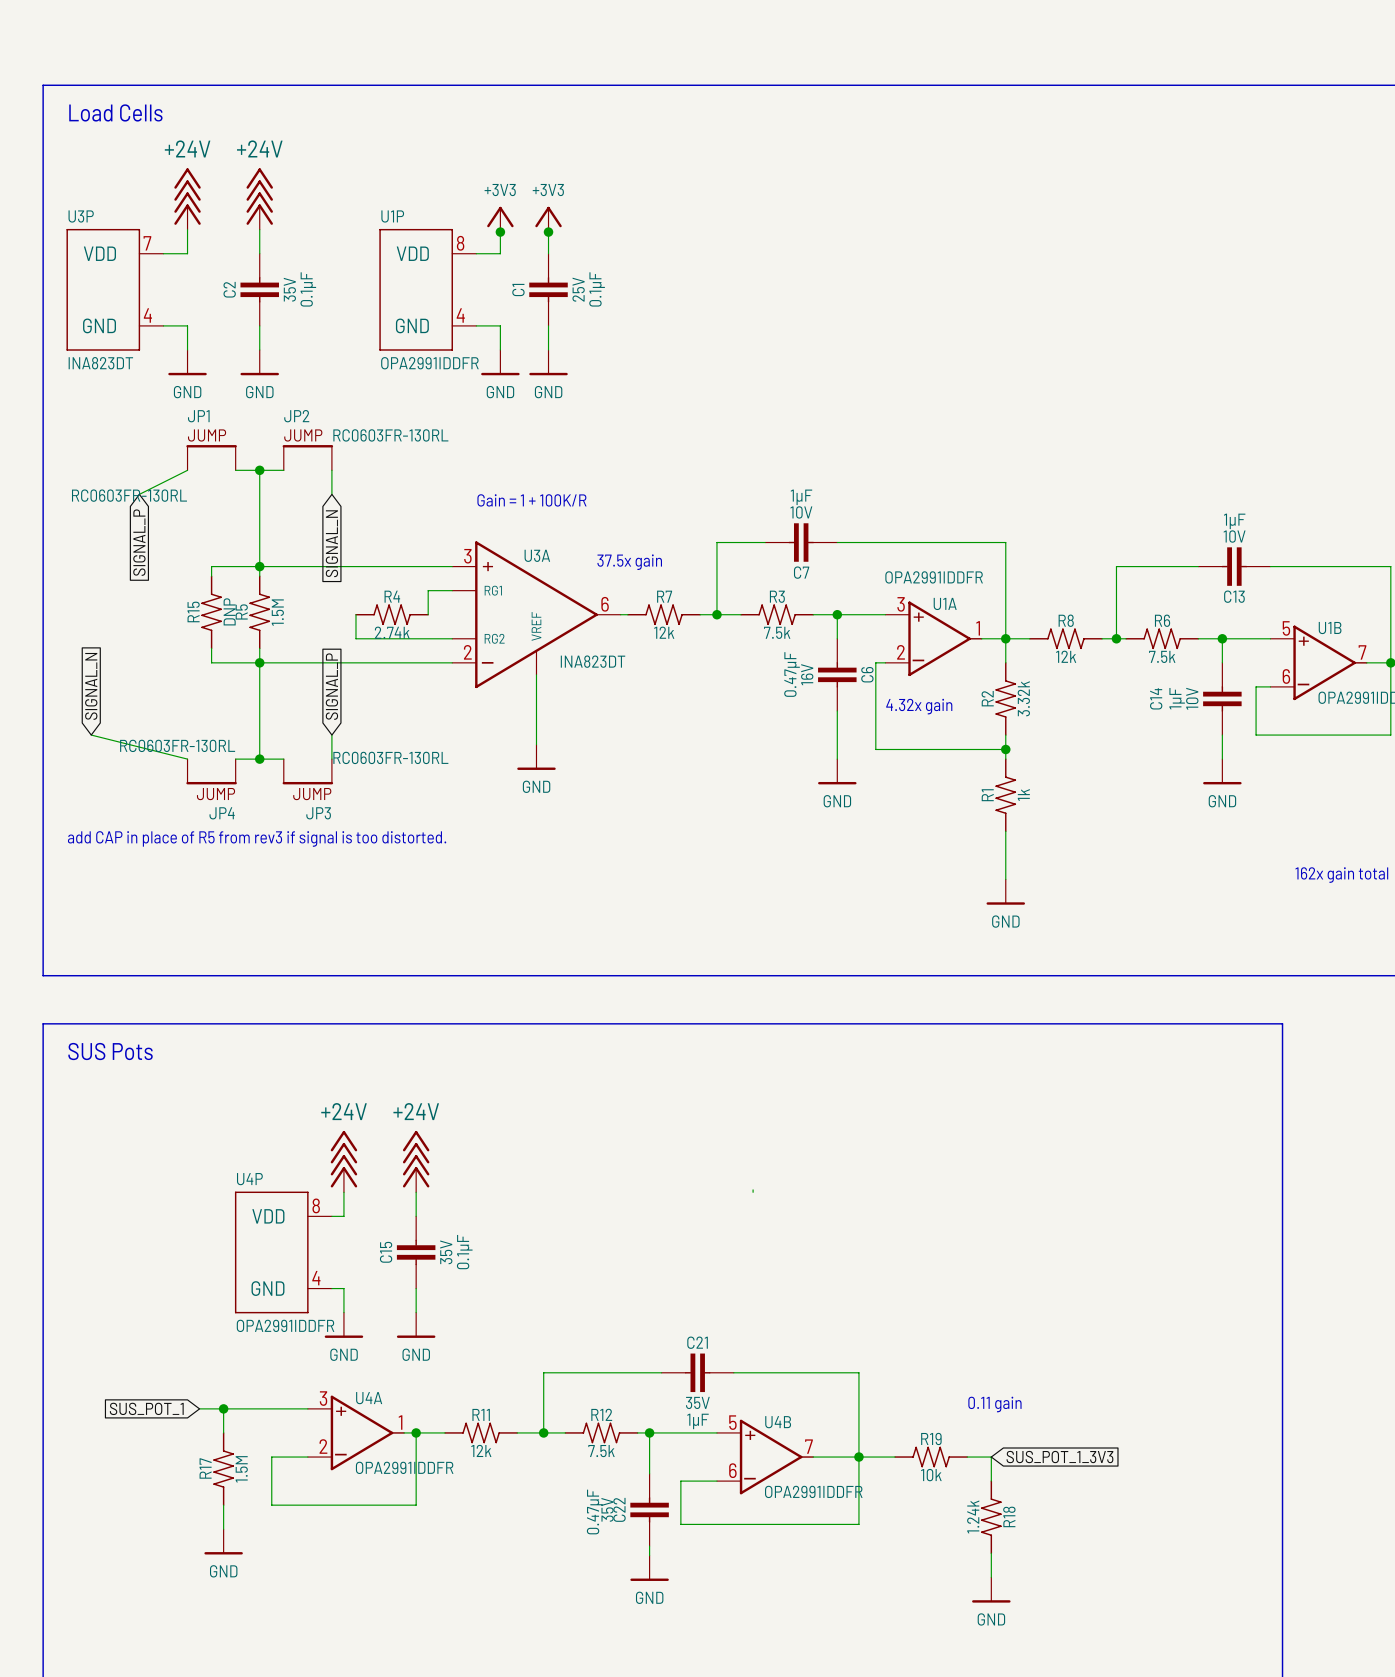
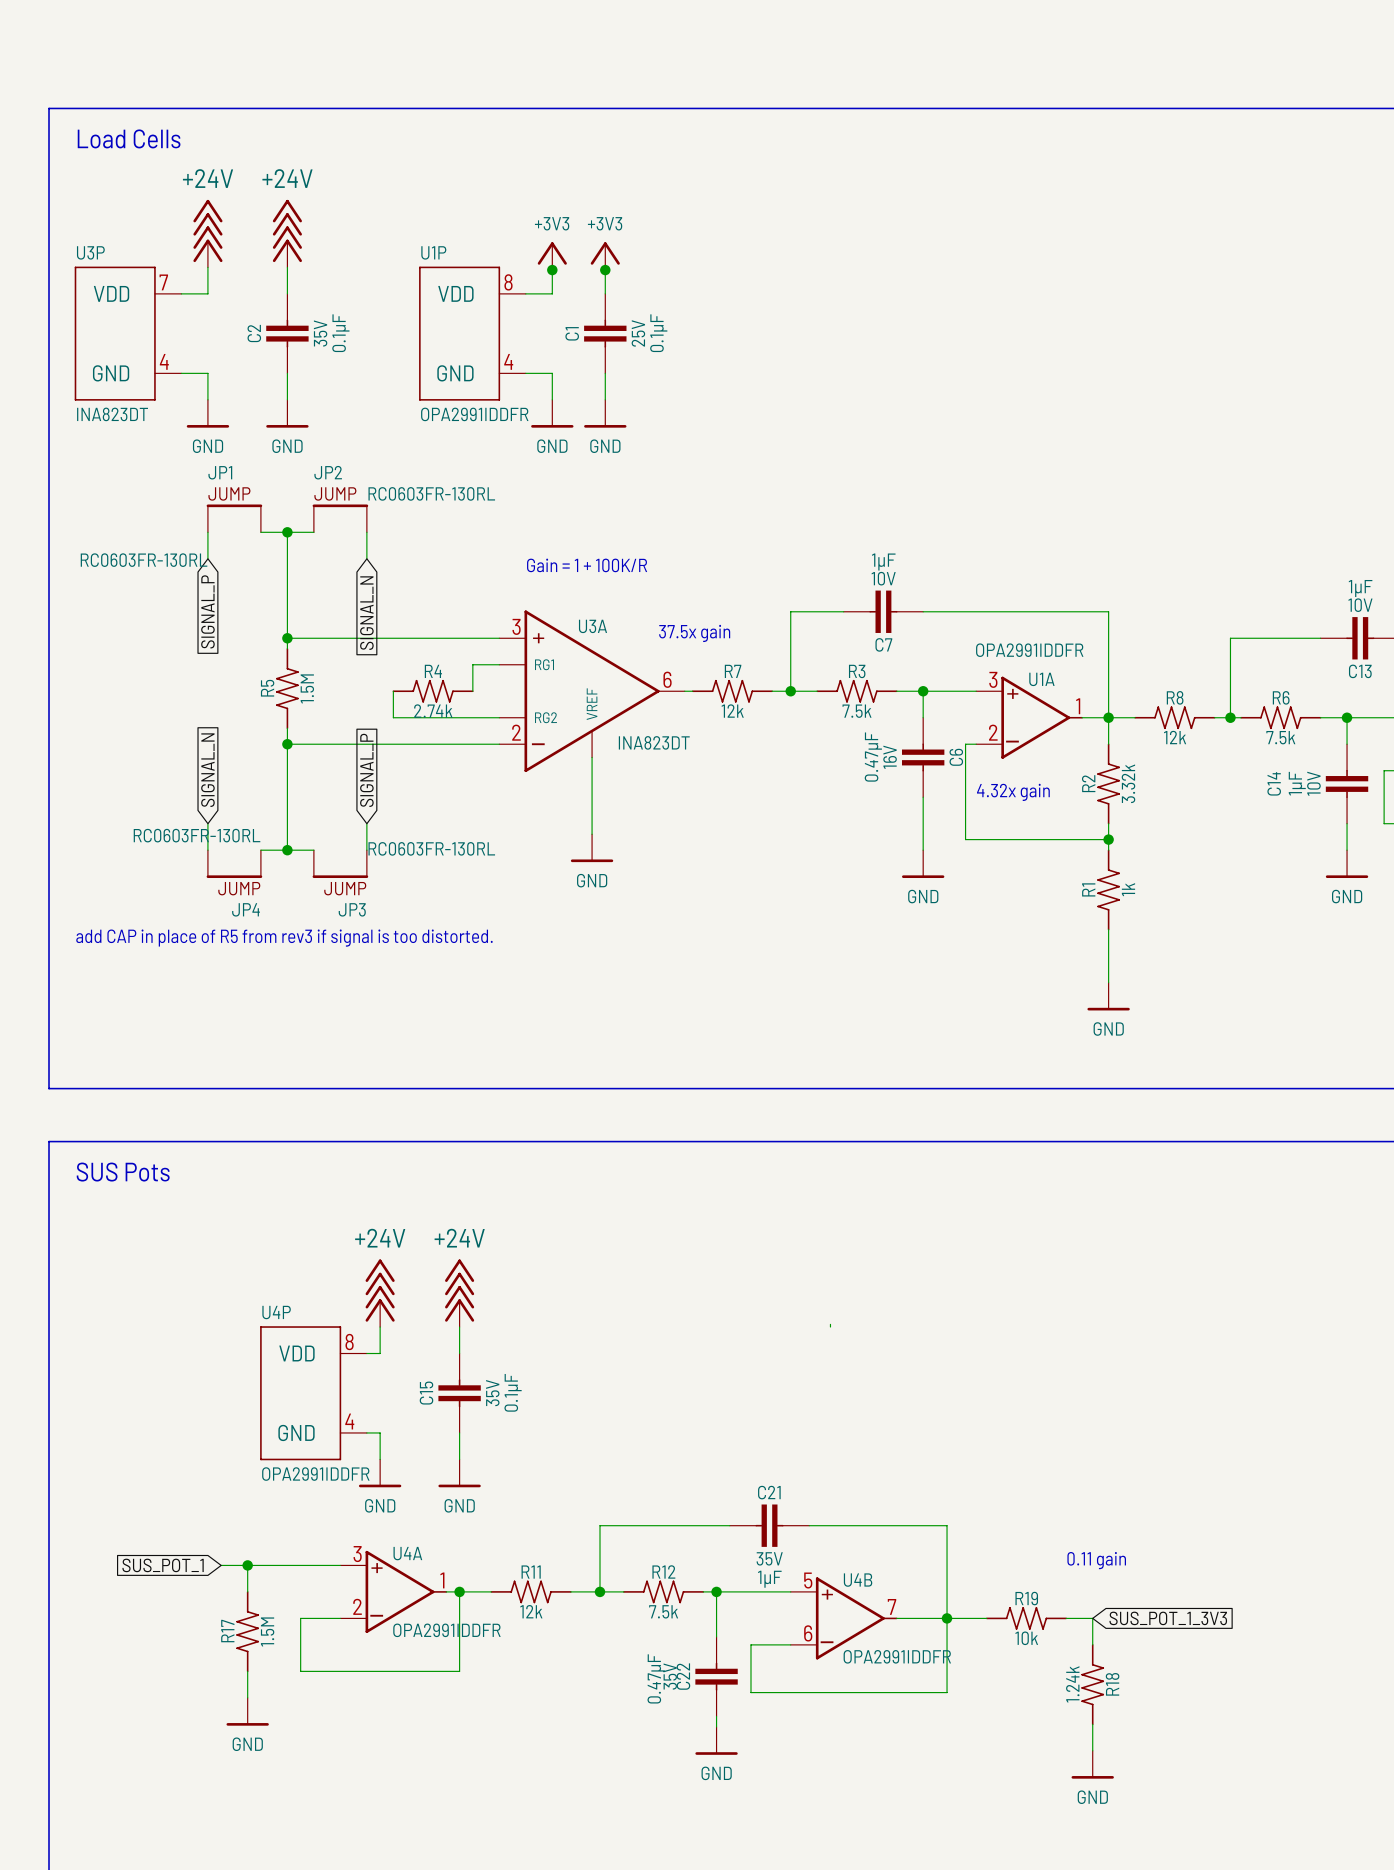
wire: (187, 470) (139, 494) -> (207, 532) (207, 558)
global label position: SIGNAL_P (139, 542) -> SIGNAL_P (207, 611)
wire: (259, 566) (211, 566) (211, 576) -> none
R15: (211, 612) -> none
wire: (211, 648) (211, 662) (259, 662) -> none
global label position: SIGNAL_N (91, 686) -> SIGNAL_N (207, 770)
wire: (91, 735) (187, 759) -> (207, 823) (207, 850)

